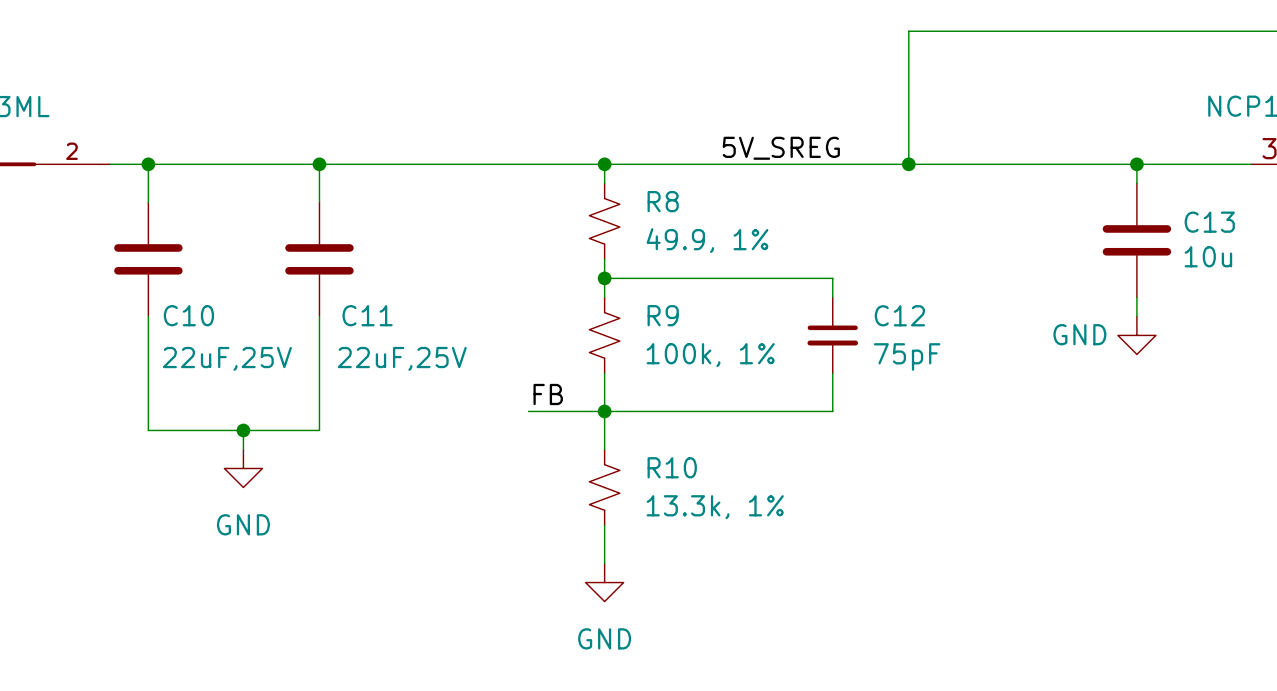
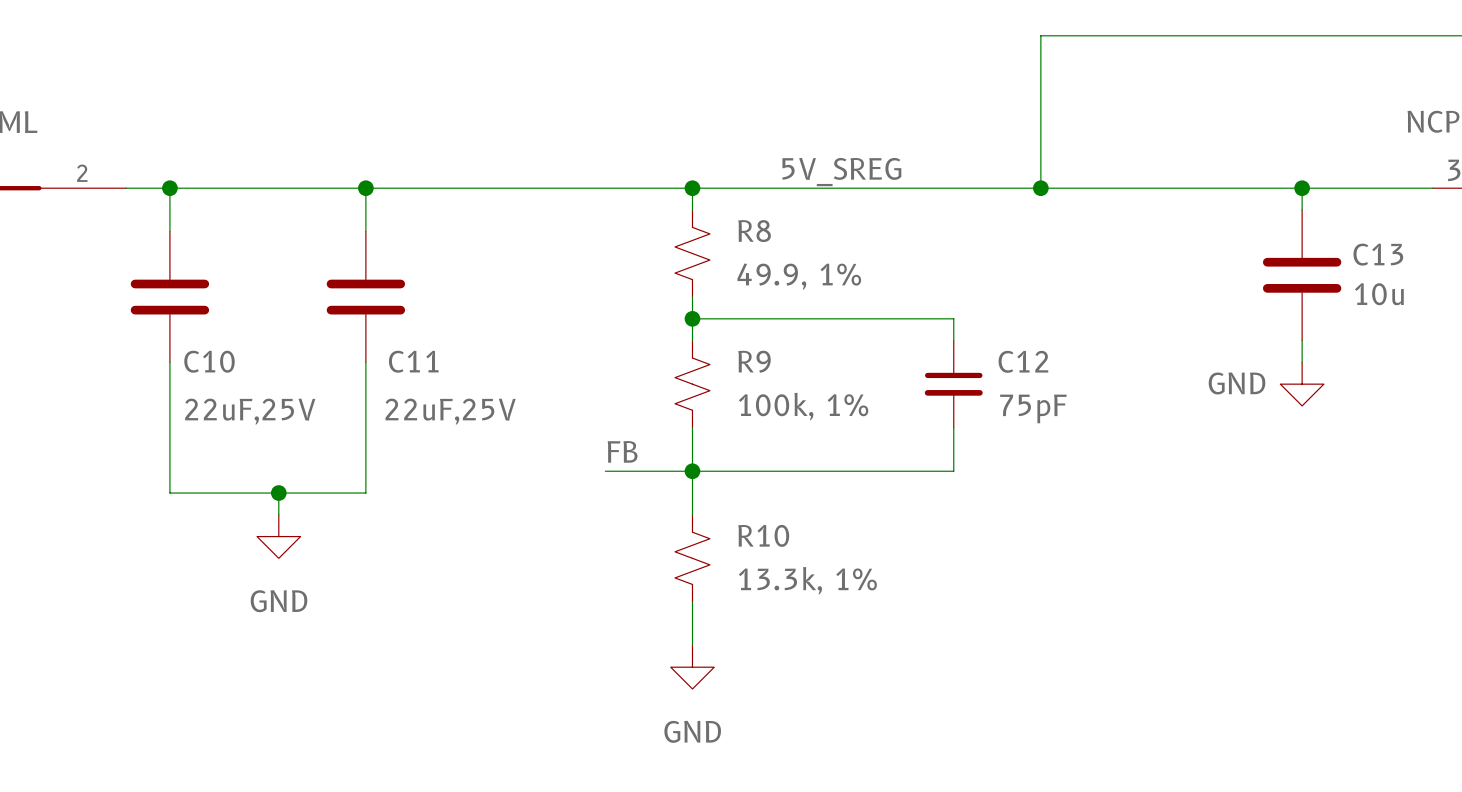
label position: 5V_SREG (781, 148) -> 5V_SREG (841, 172)

